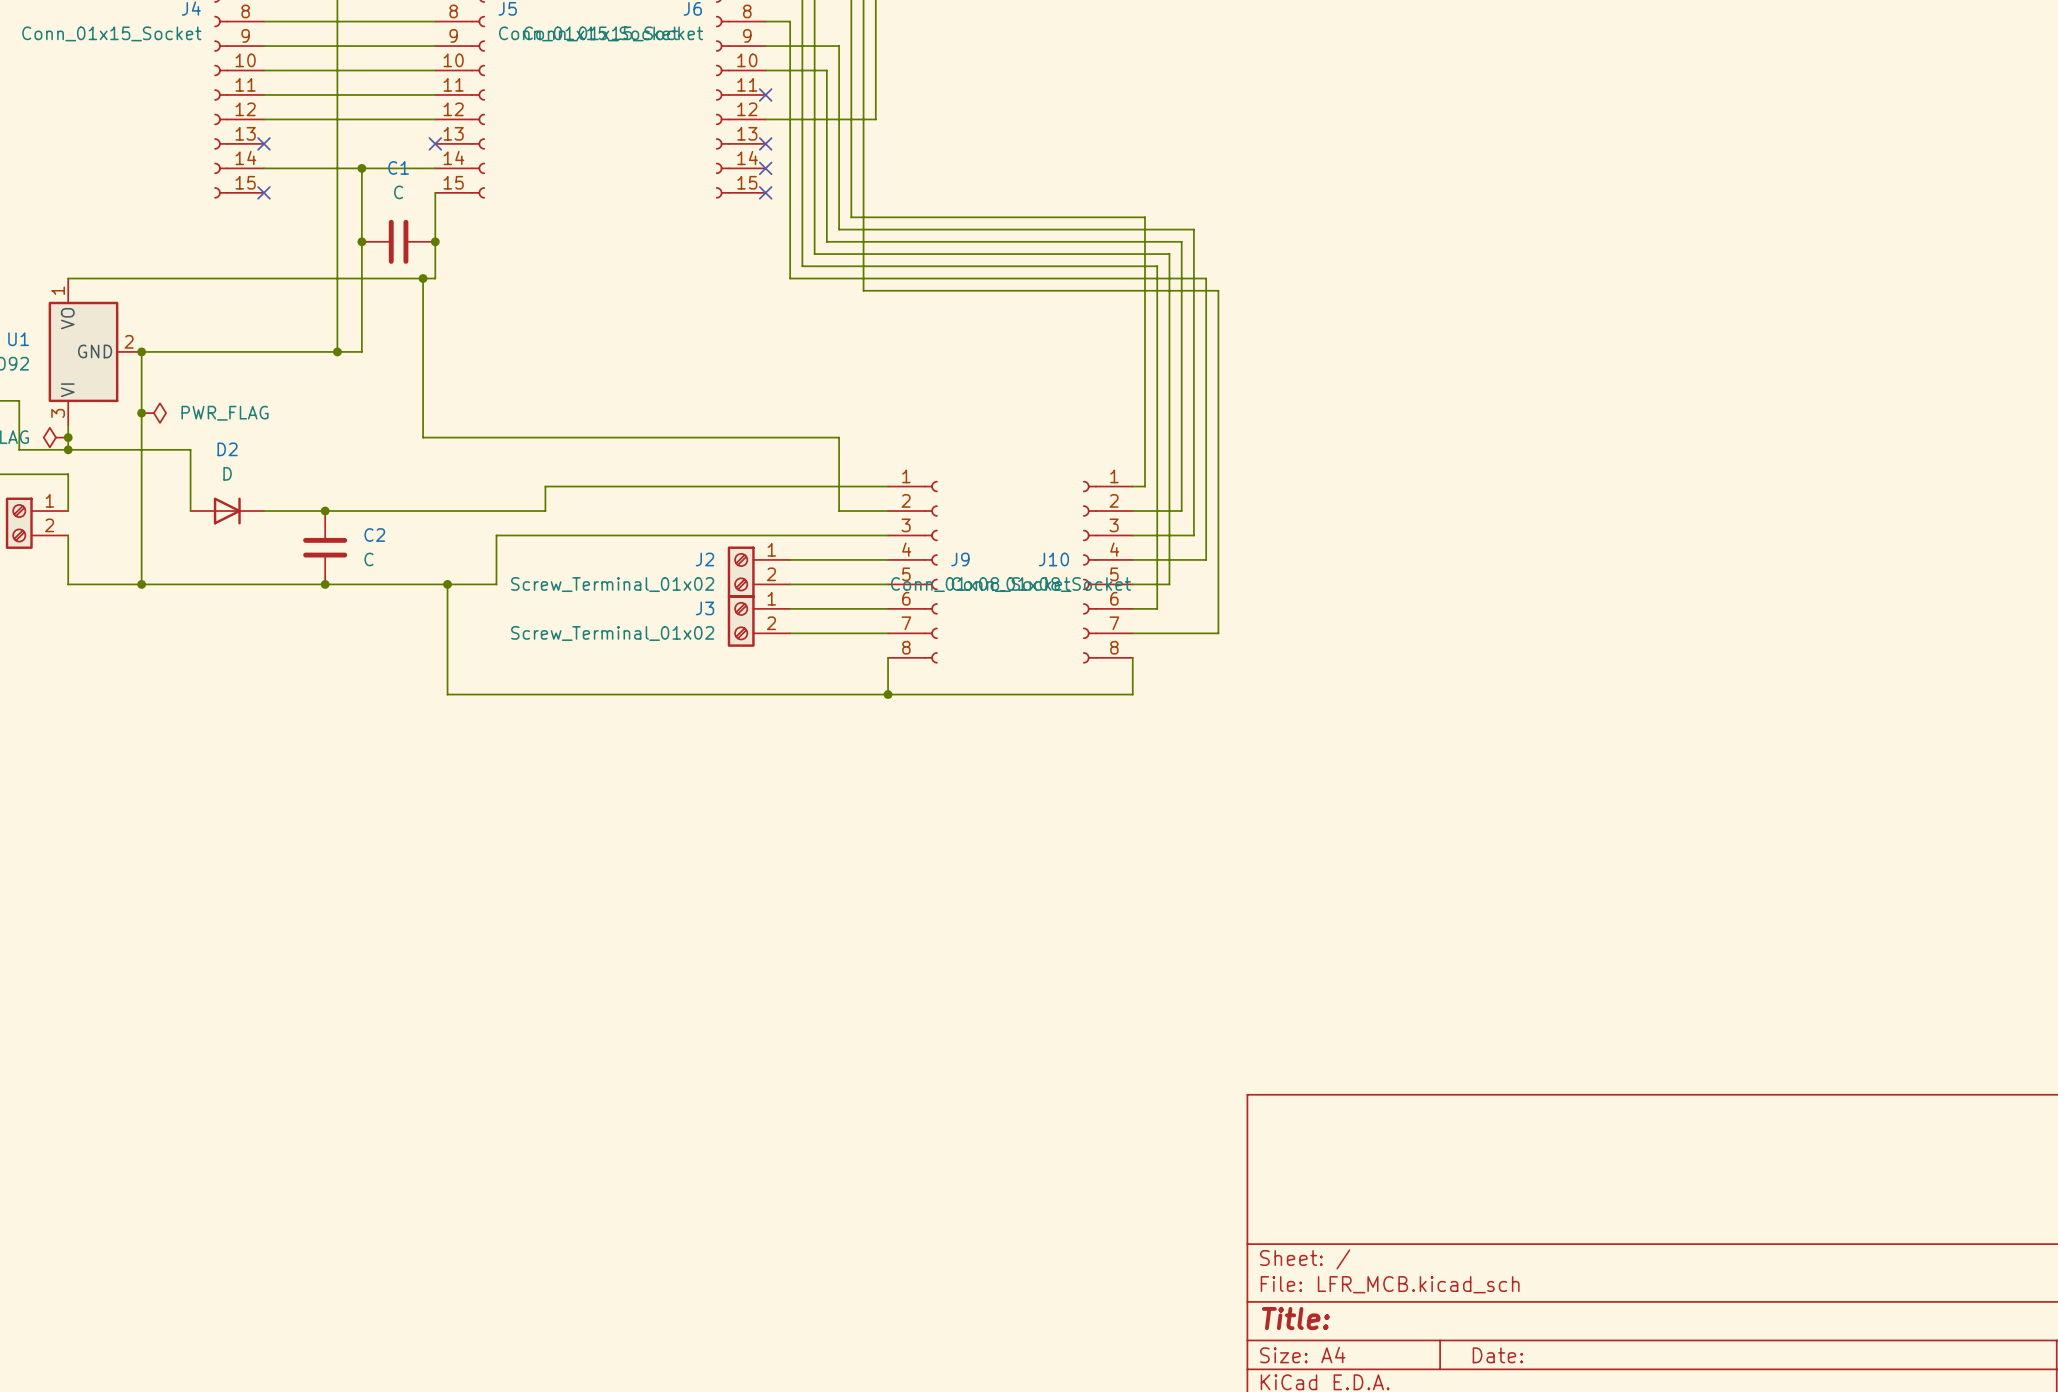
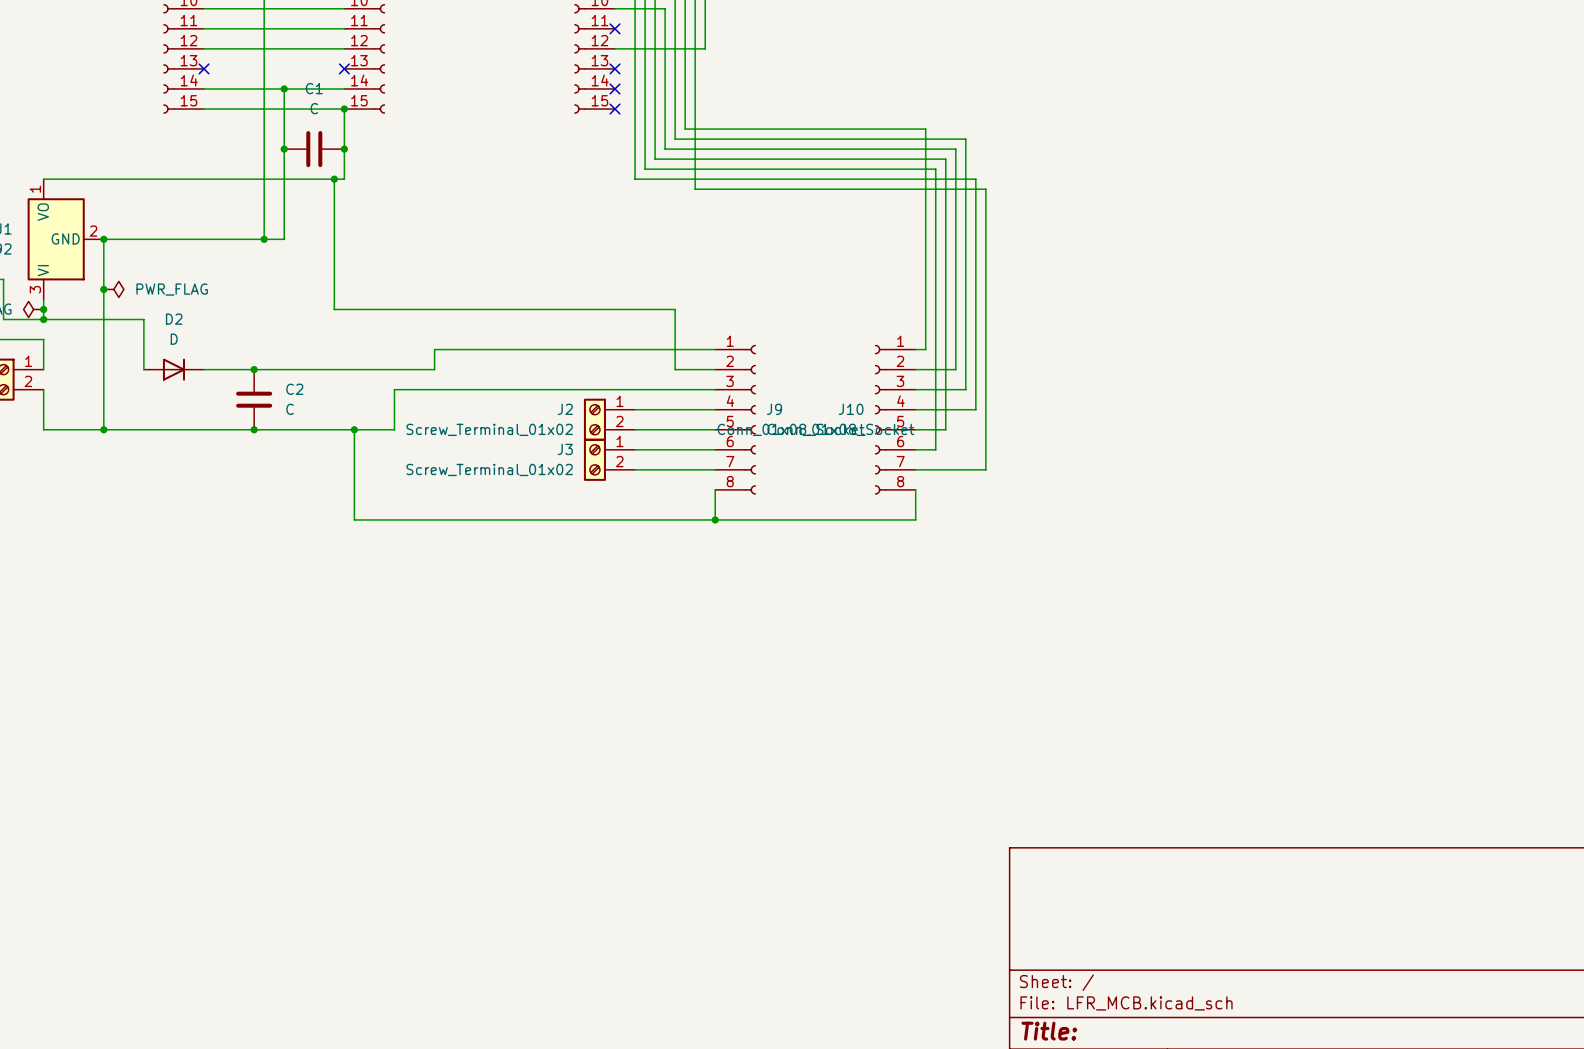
wire: none -> (204, 109) (344, 109)
no-connect mark: (263, 192) -> none
junction: none -> (344, 109)

